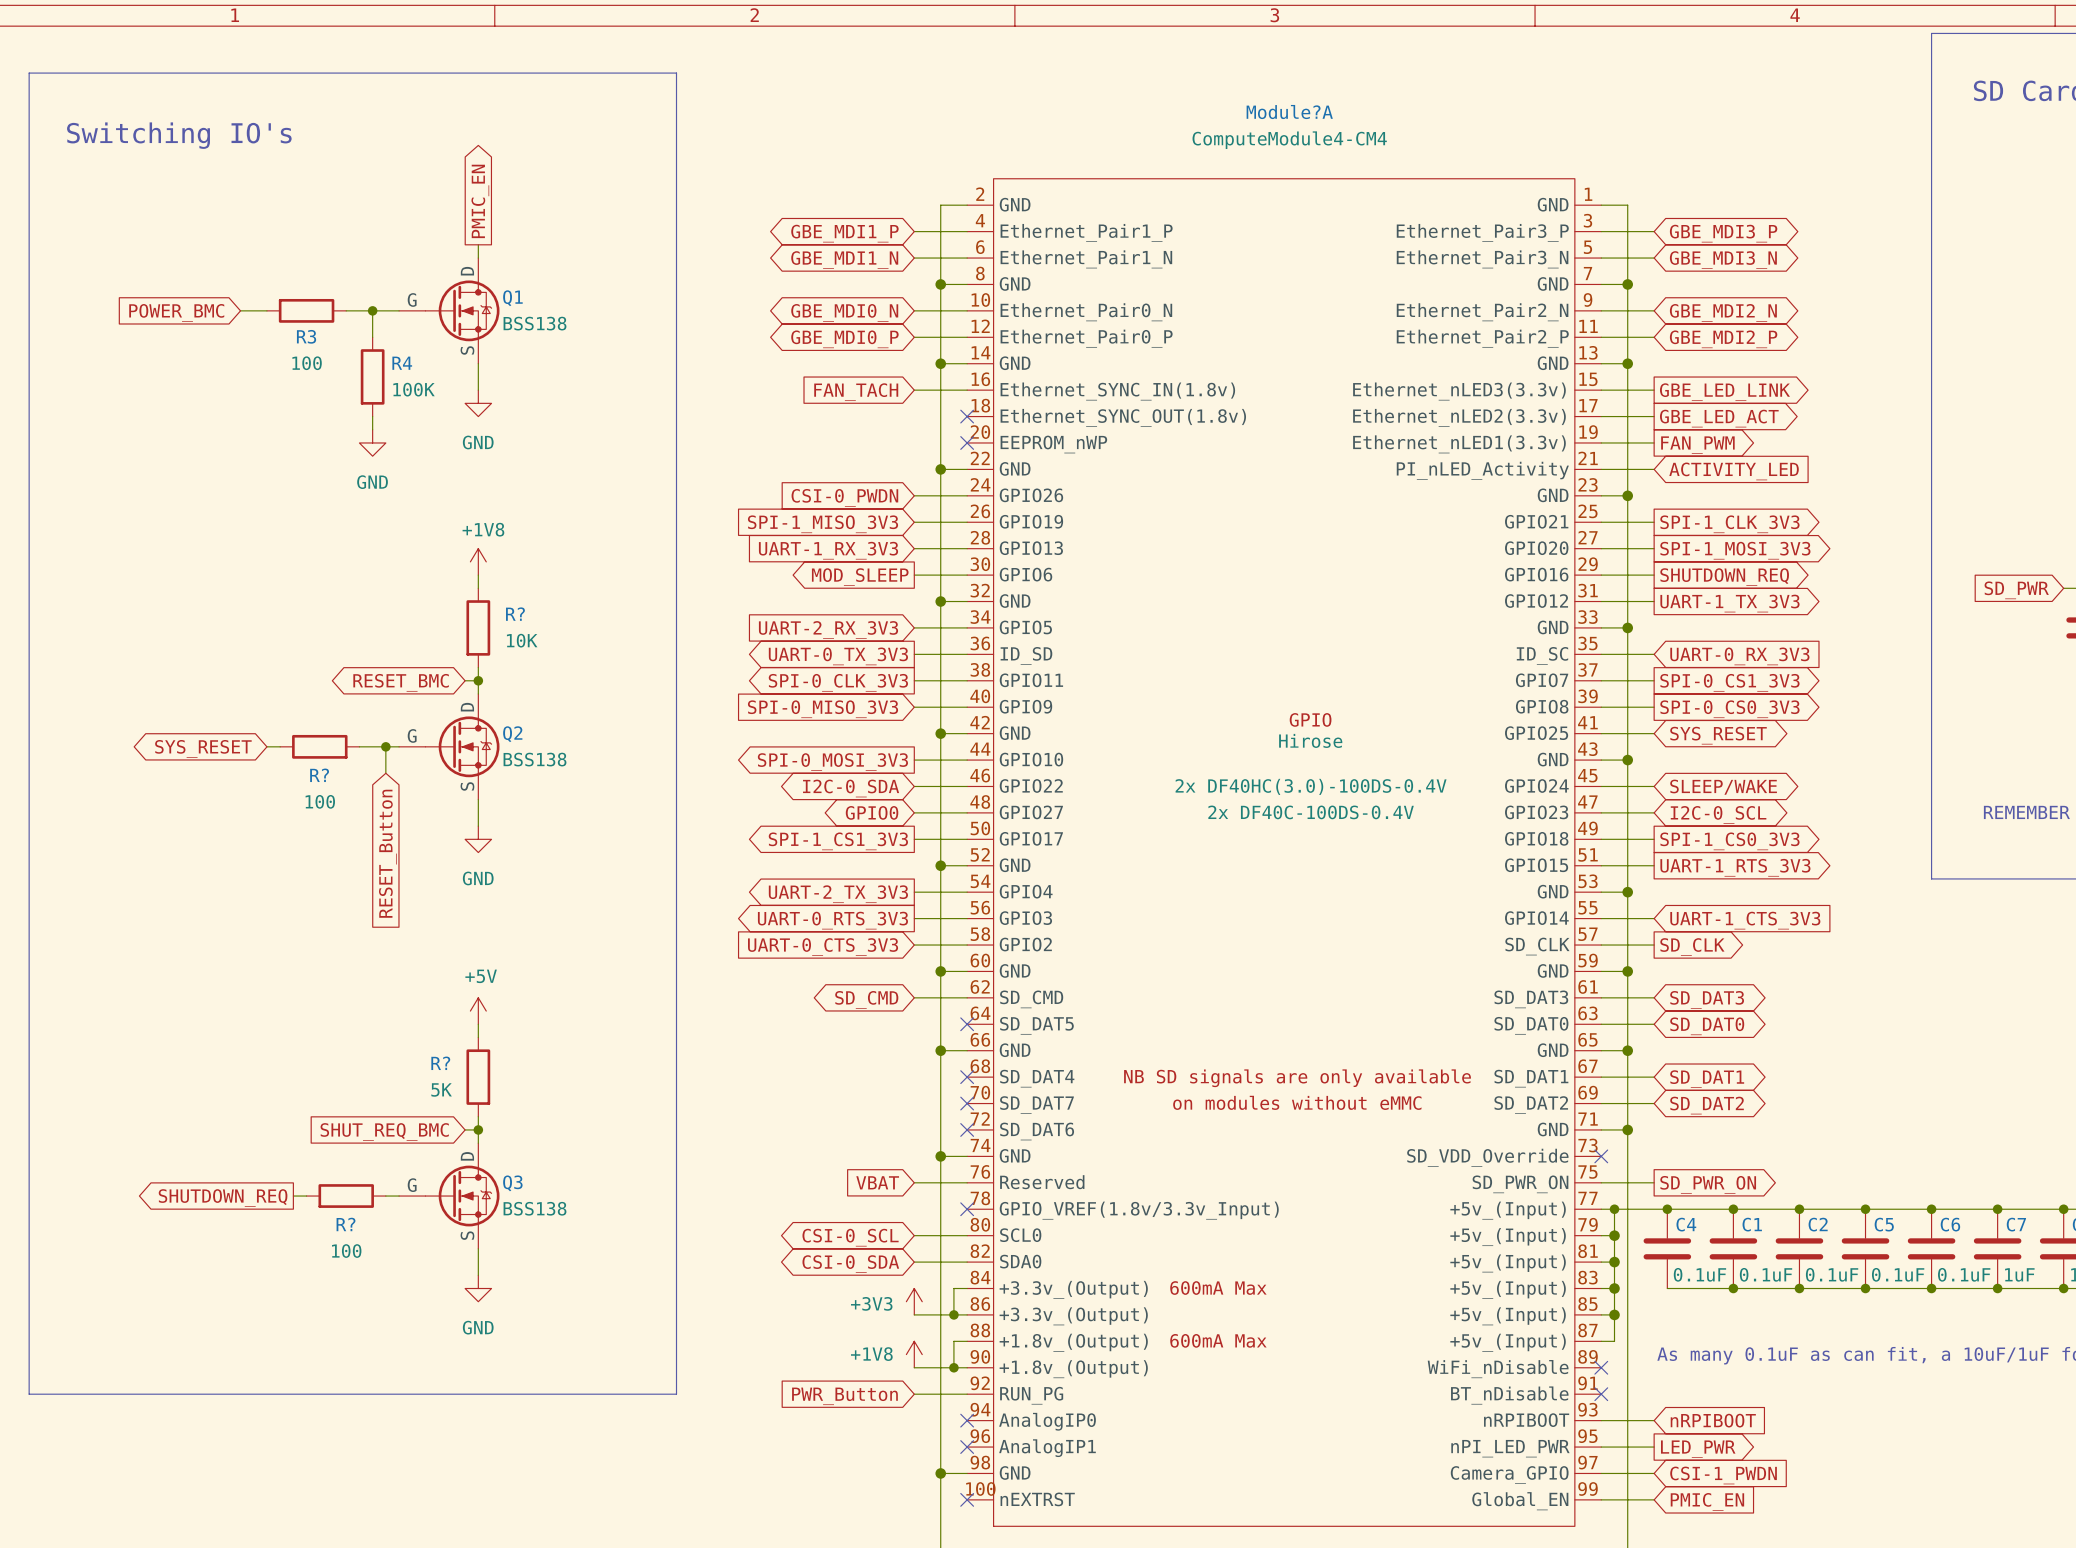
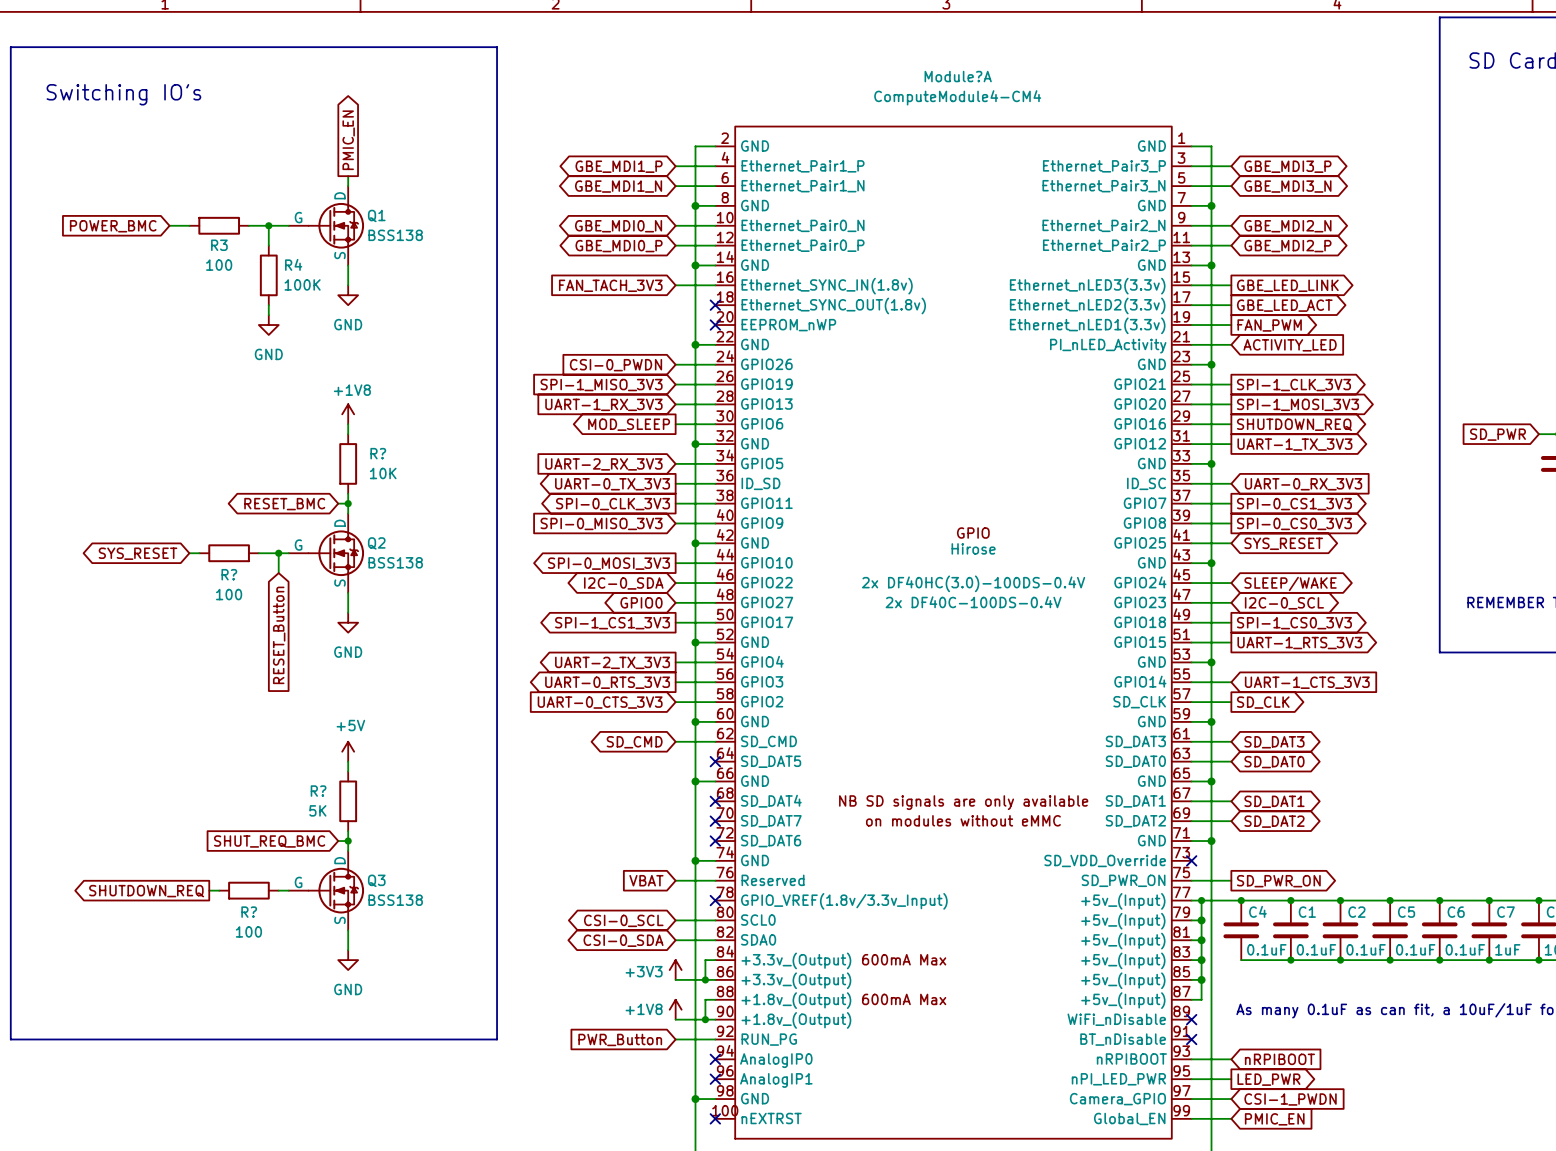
global label: FAN_TACH (856, 392) -> FAN_TACH_3V3 (610, 285)

